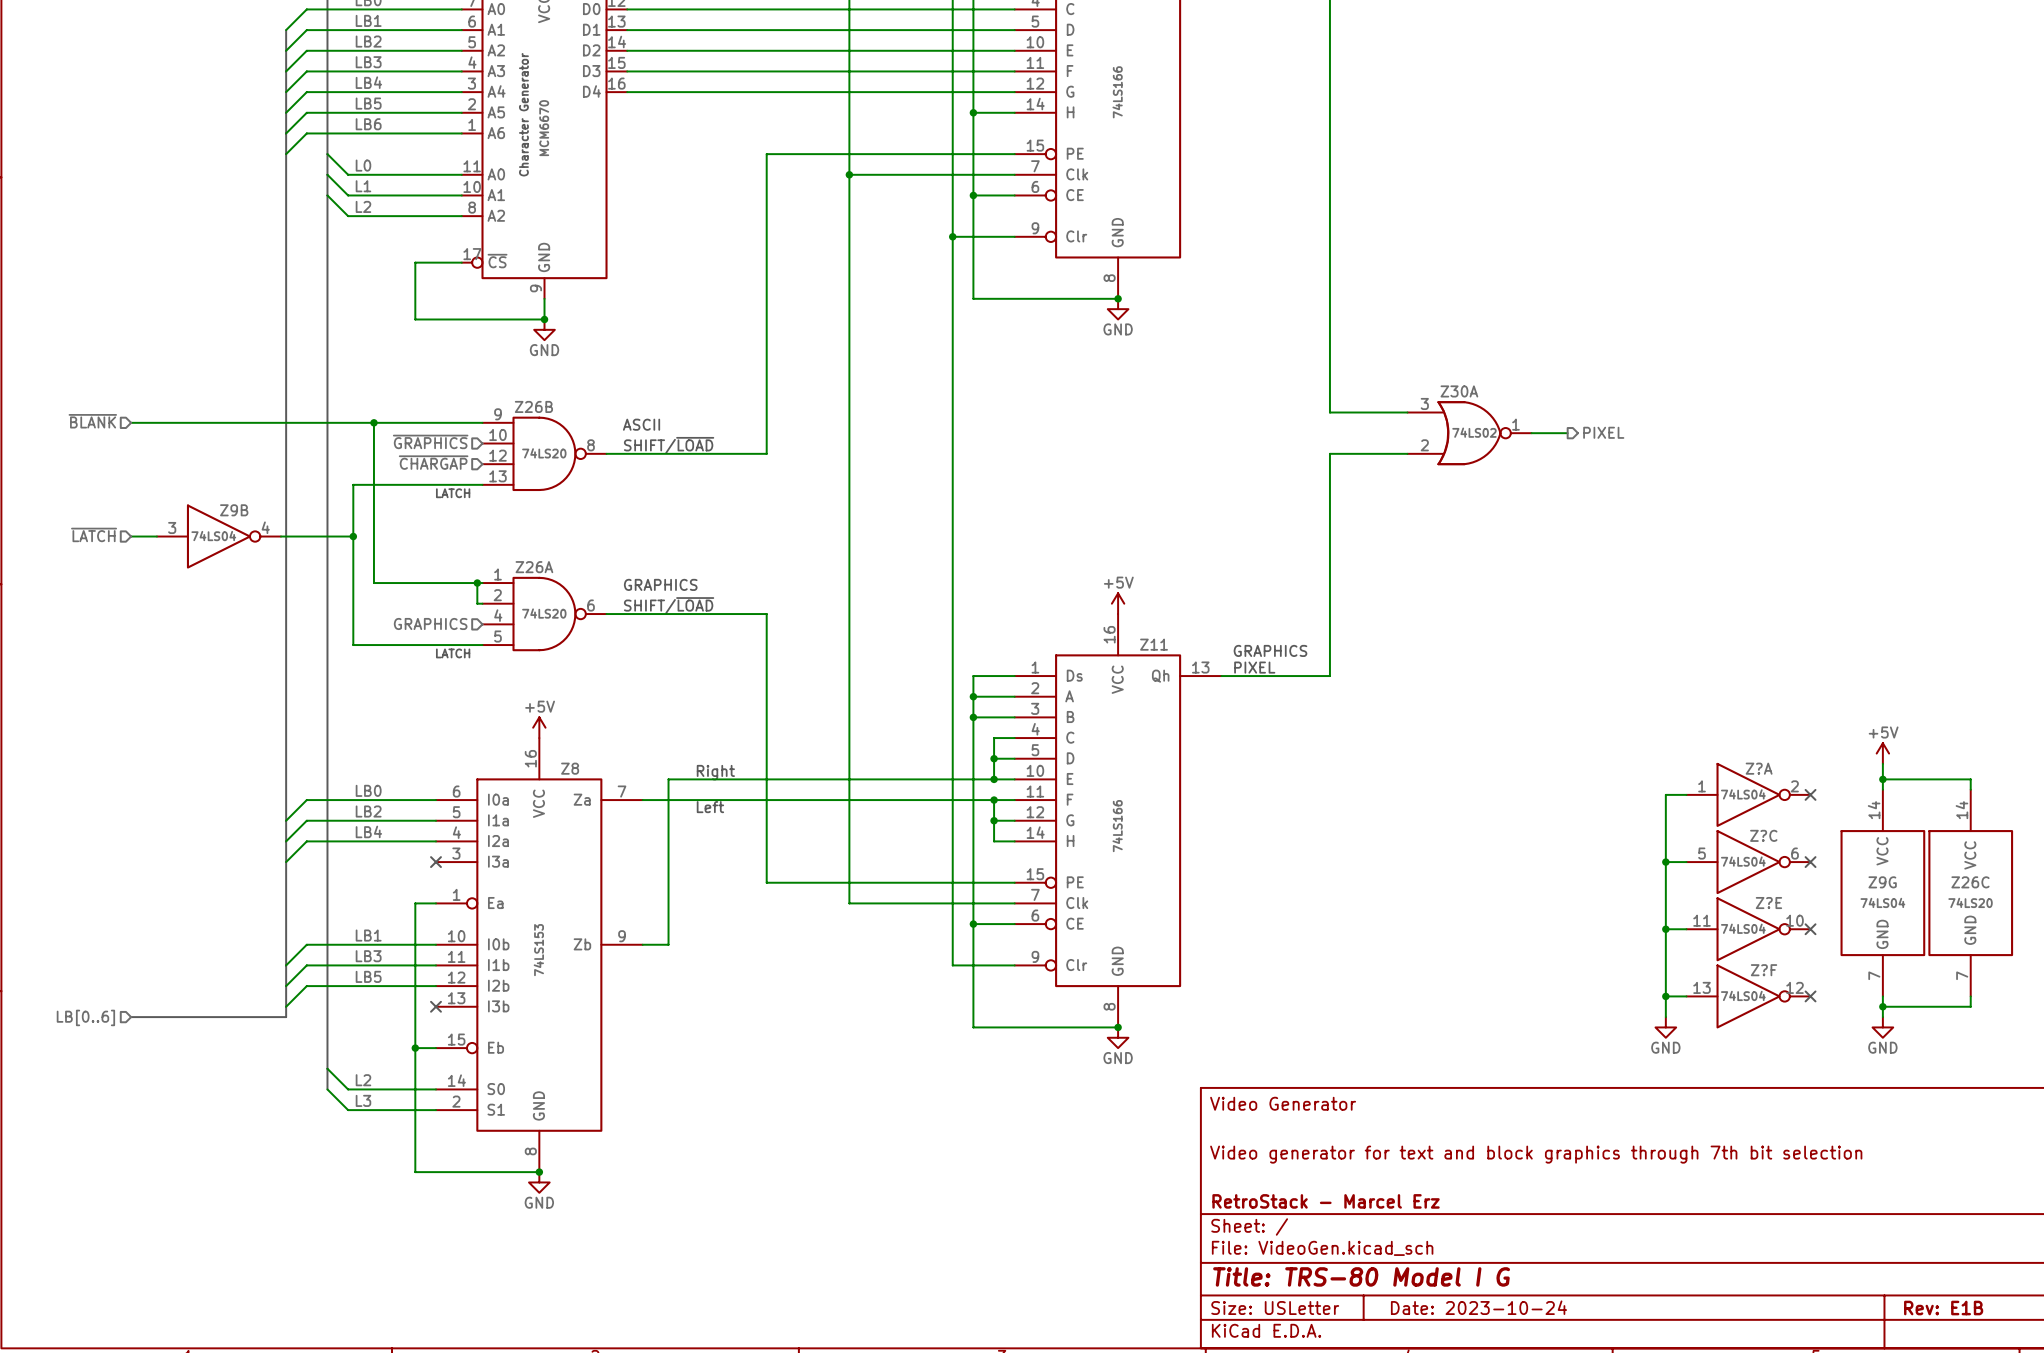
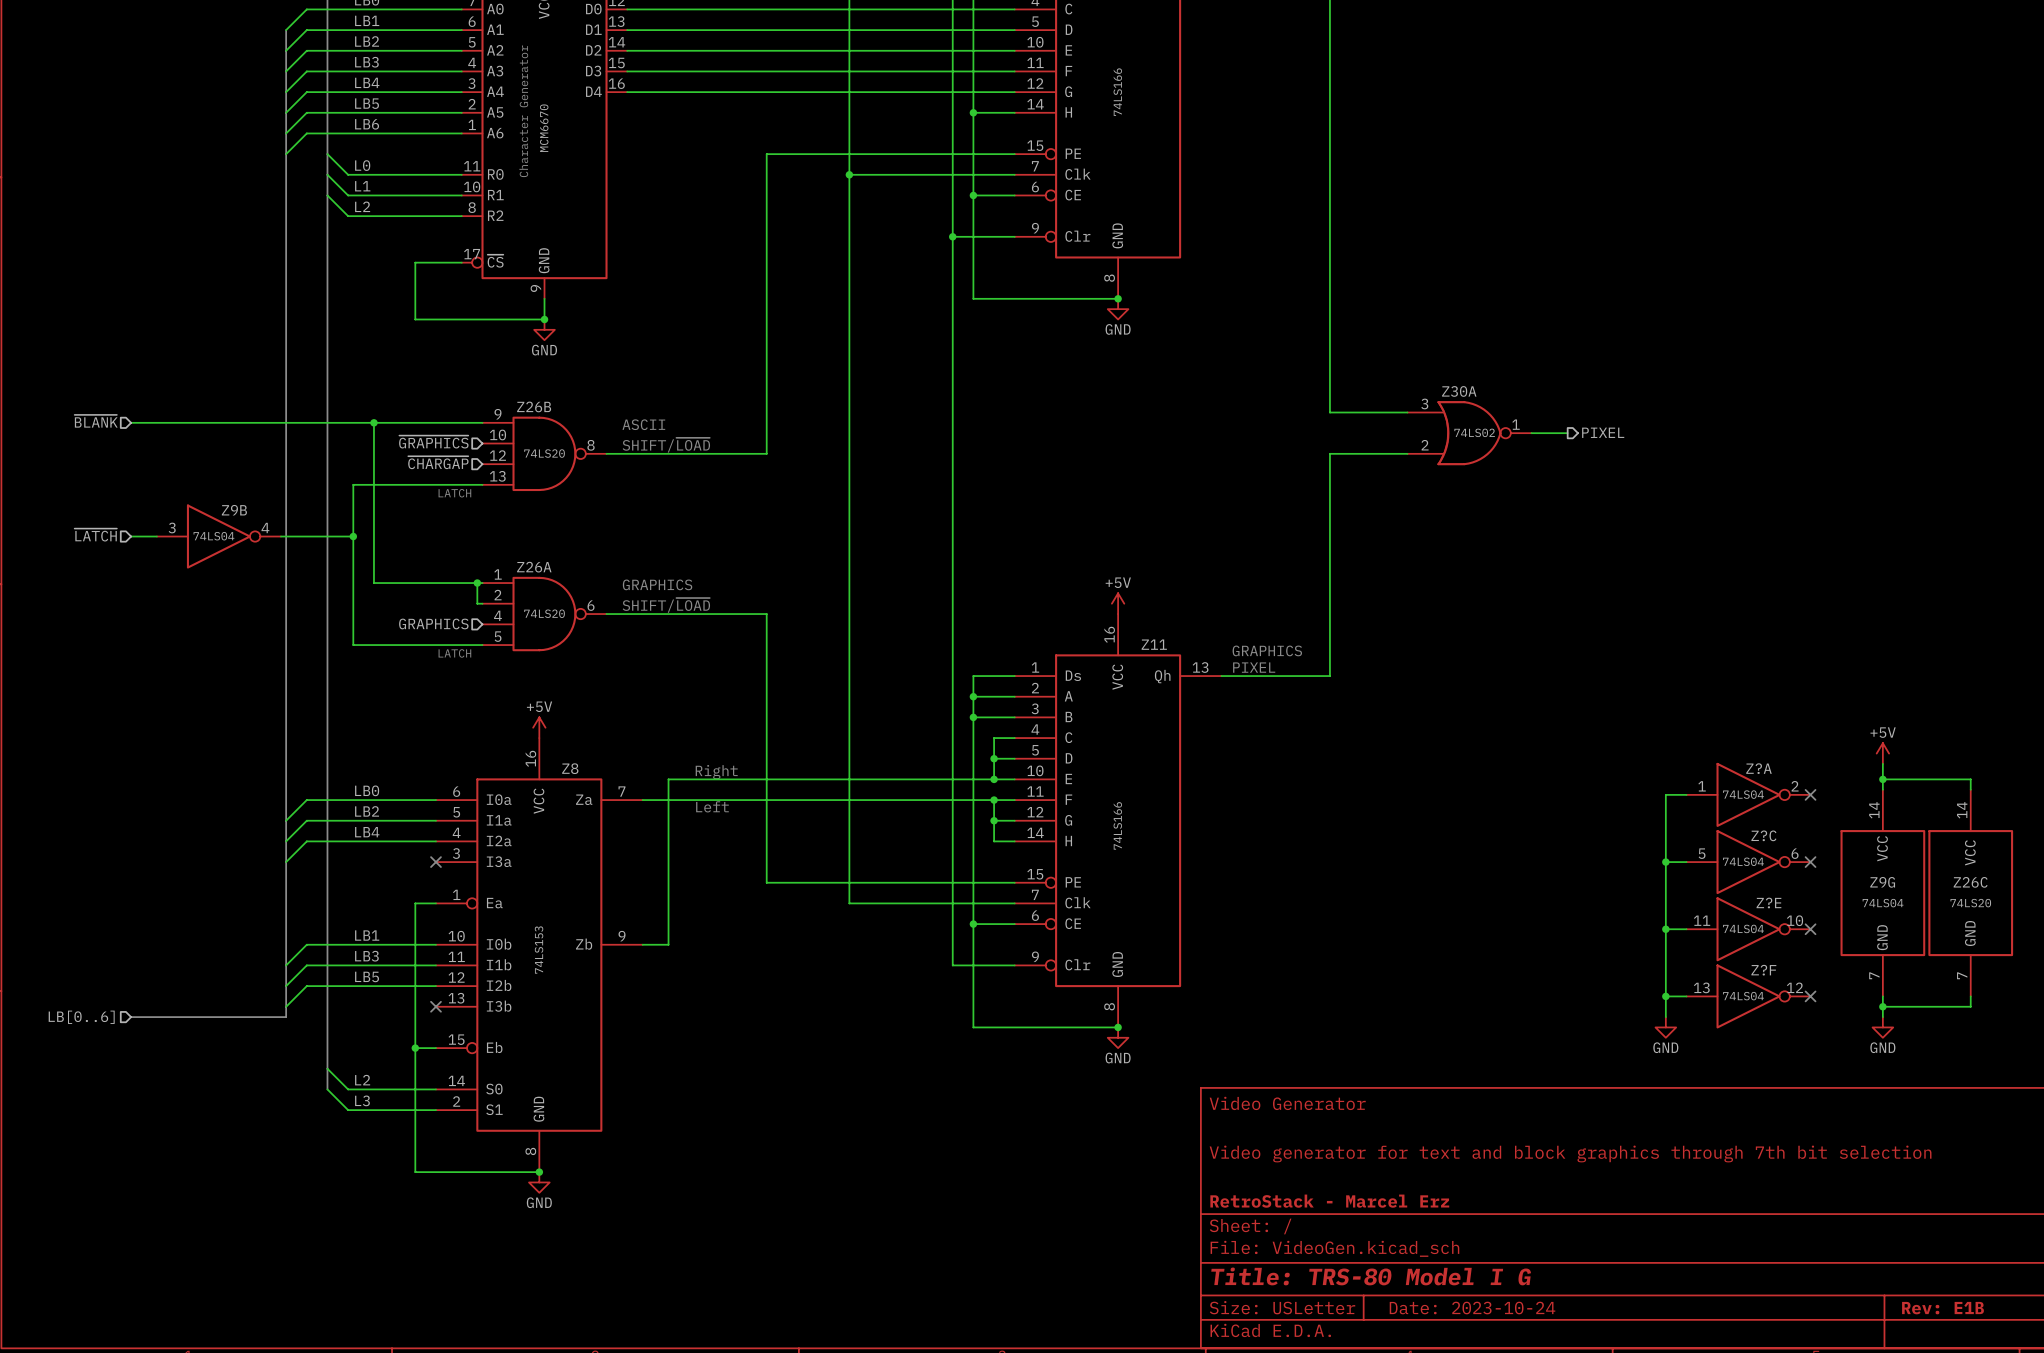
part pin name: A0 (496, 174) -> R0 (495, 174)
part pin name: A1 (496, 195) -> R1 (495, 195)
part pin name: A2 (496, 215) -> R2 (495, 215)

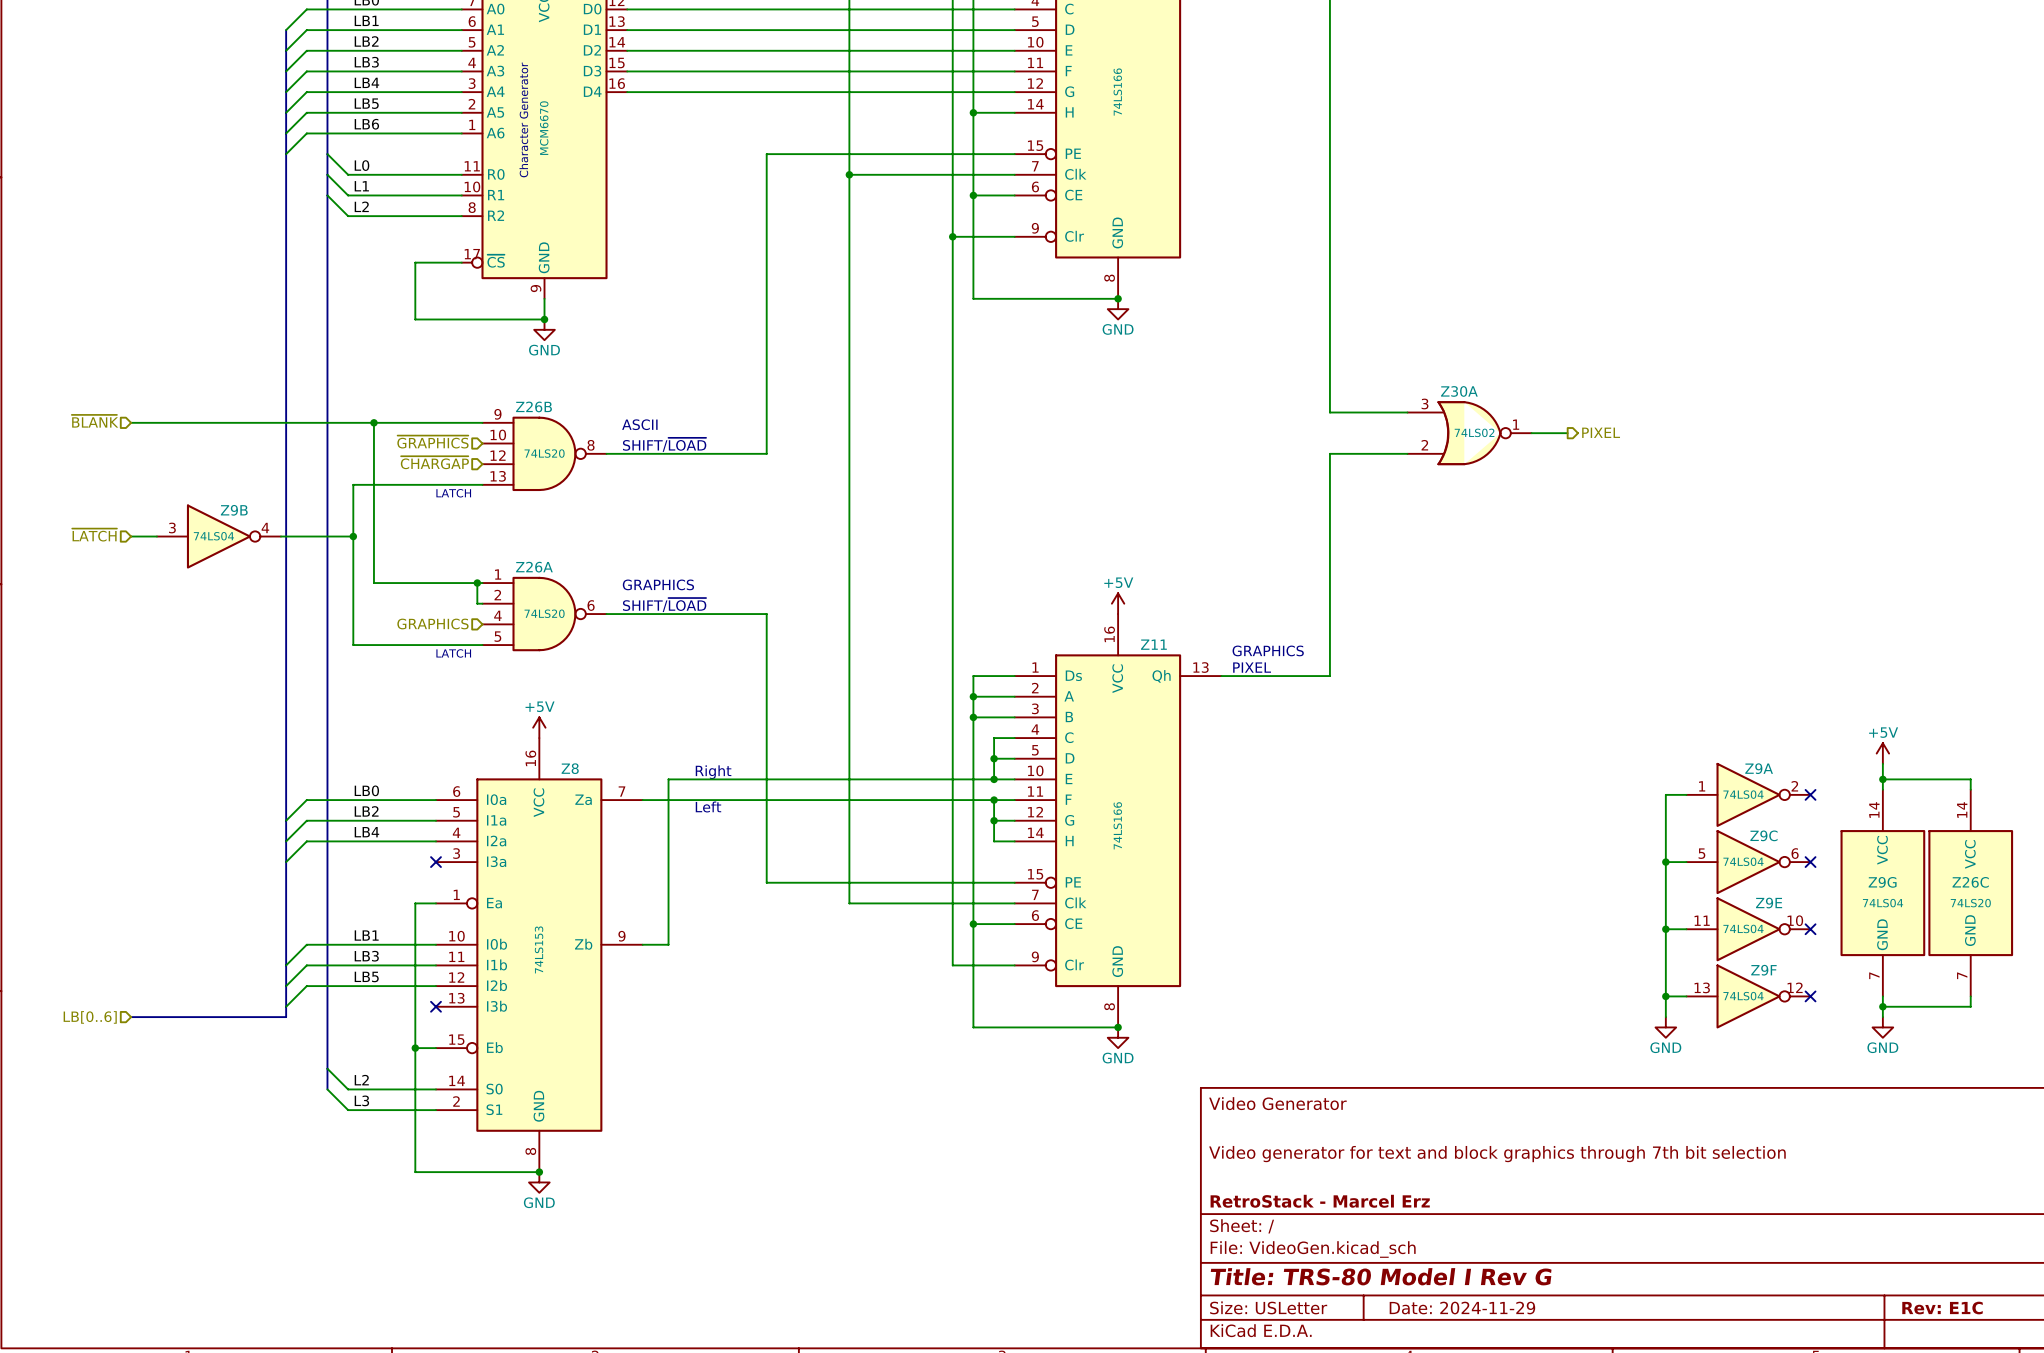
Z?A name: Z?A (1758, 768) -> Z9A (1759, 768)
Z?C name: Z?C (1763, 835) -> Z9C (1763, 835)
Z?E name: Z?E (1768, 903) -> Z9E (1769, 903)
Z?F name: Z?F (1763, 970) -> Z9F (1763, 970)
title block: Title: TRS-80 Model I G (1371, 1276) -> Title: TRS-80 Model I Rev G (1381, 1276)
title block: Date: 2023-10-24 (1472, 1308) -> Date: 2024-11-29 (1462, 1308)
title block: Rev: E1B (1943, 1308) -> Rev: E1C (1942, 1308)

